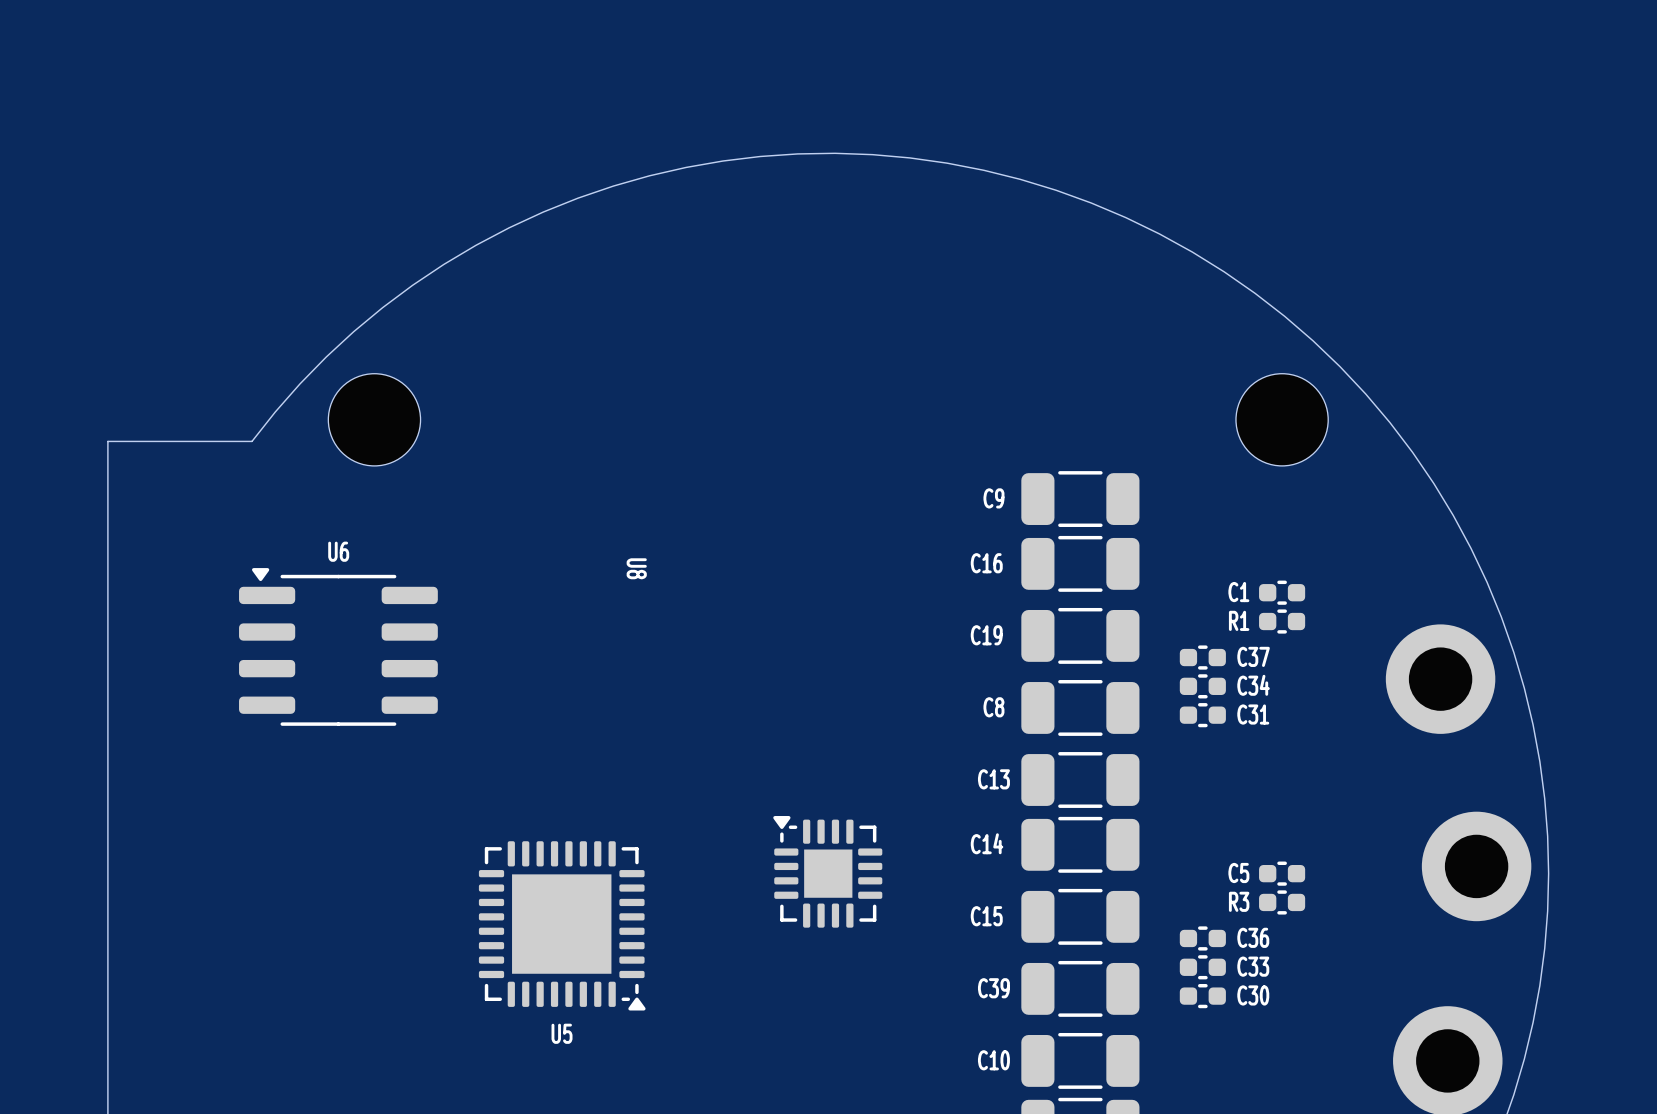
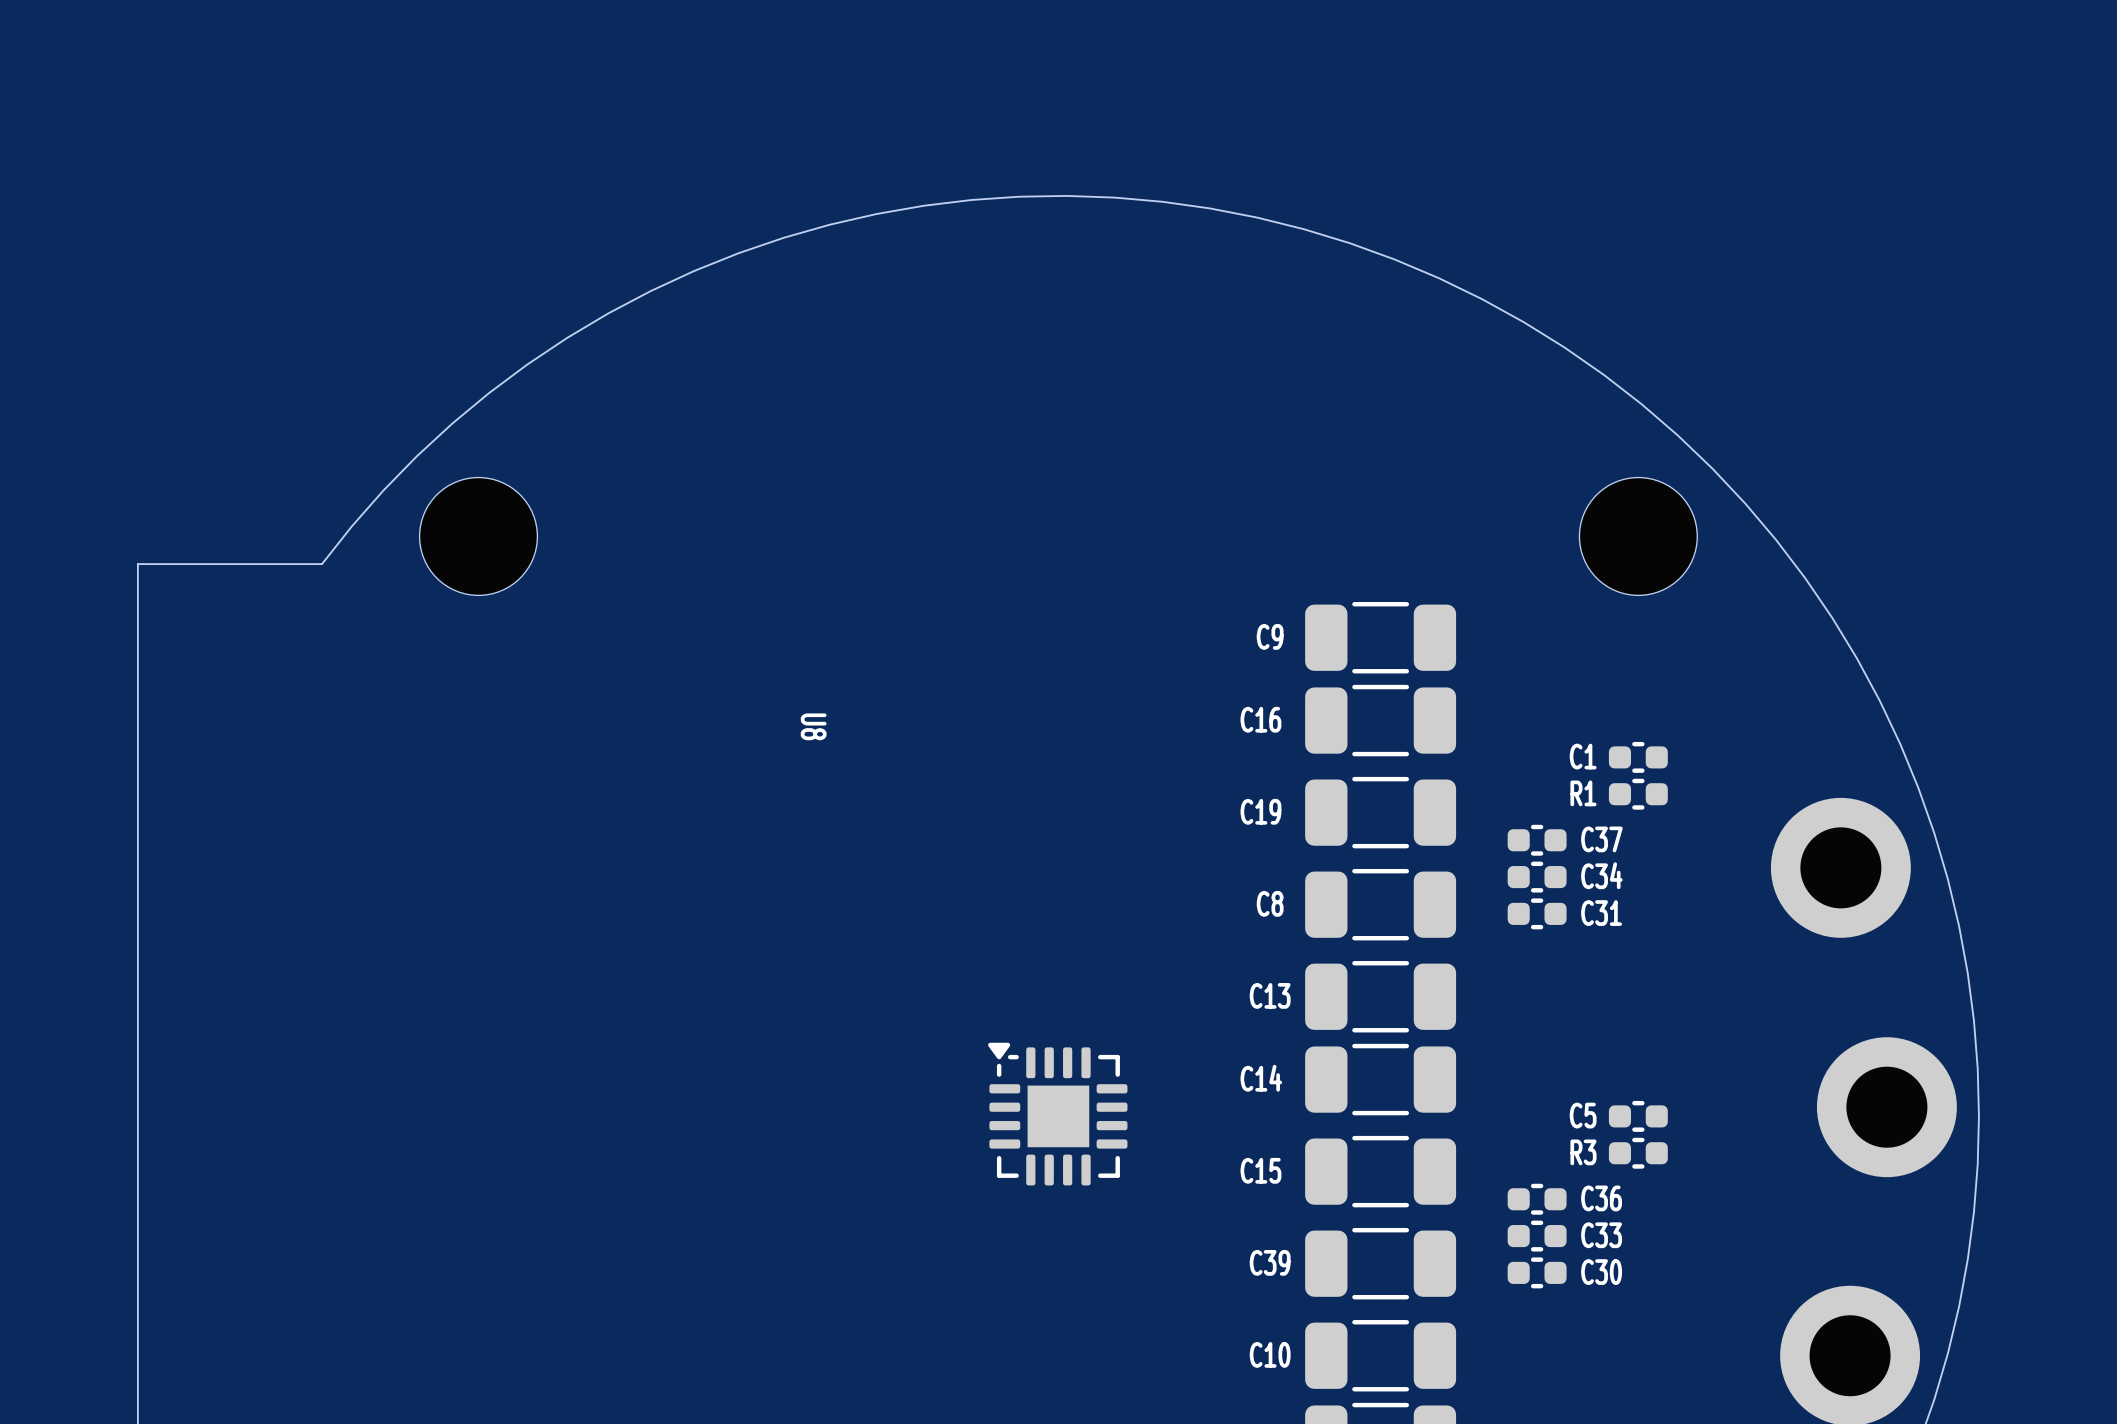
U6: (338, 646) -> none
U5: (562, 925) -> none

